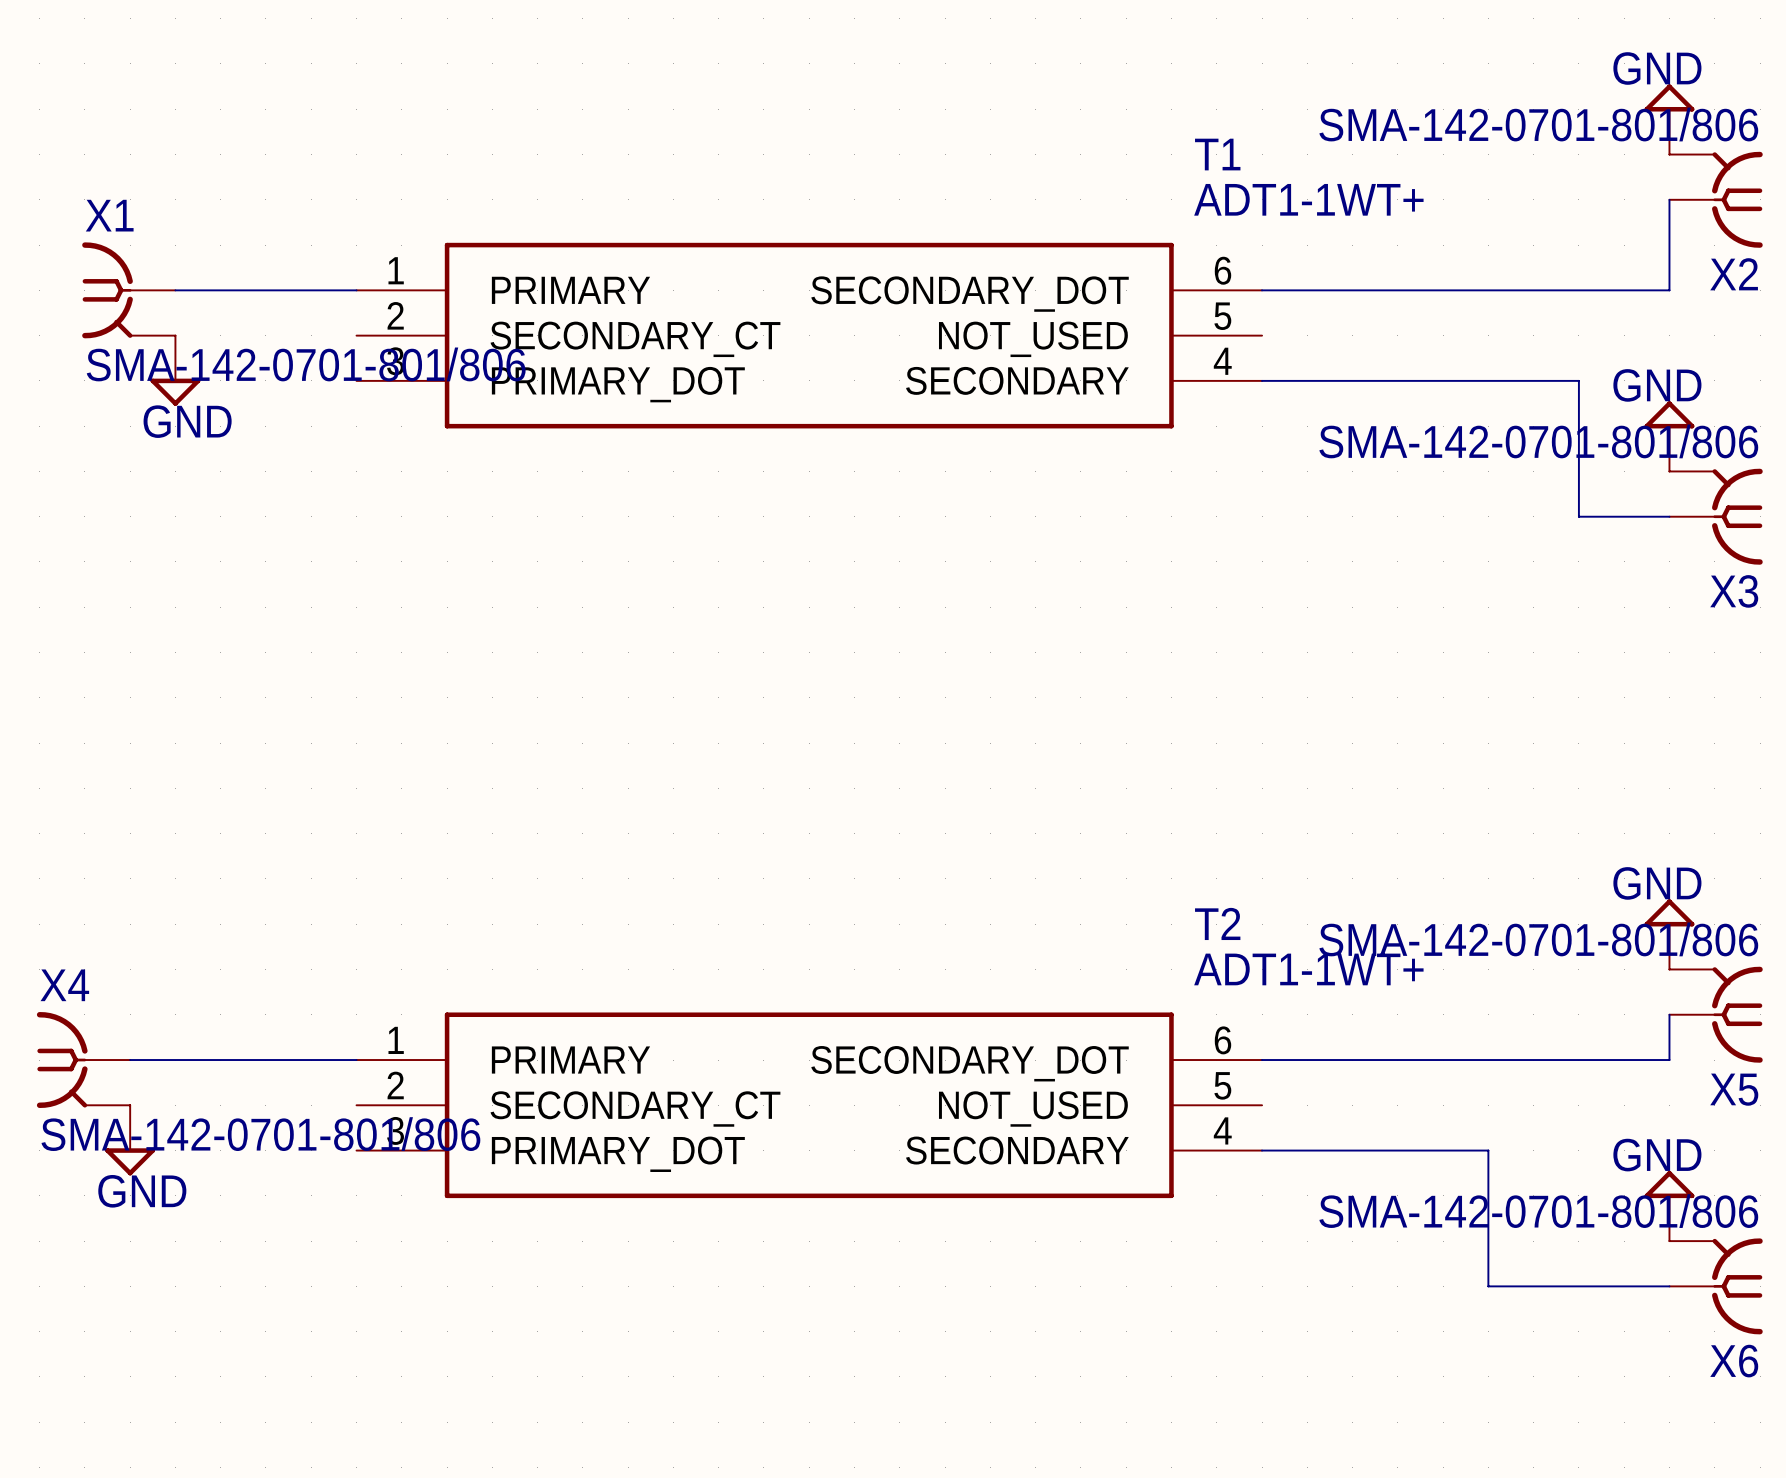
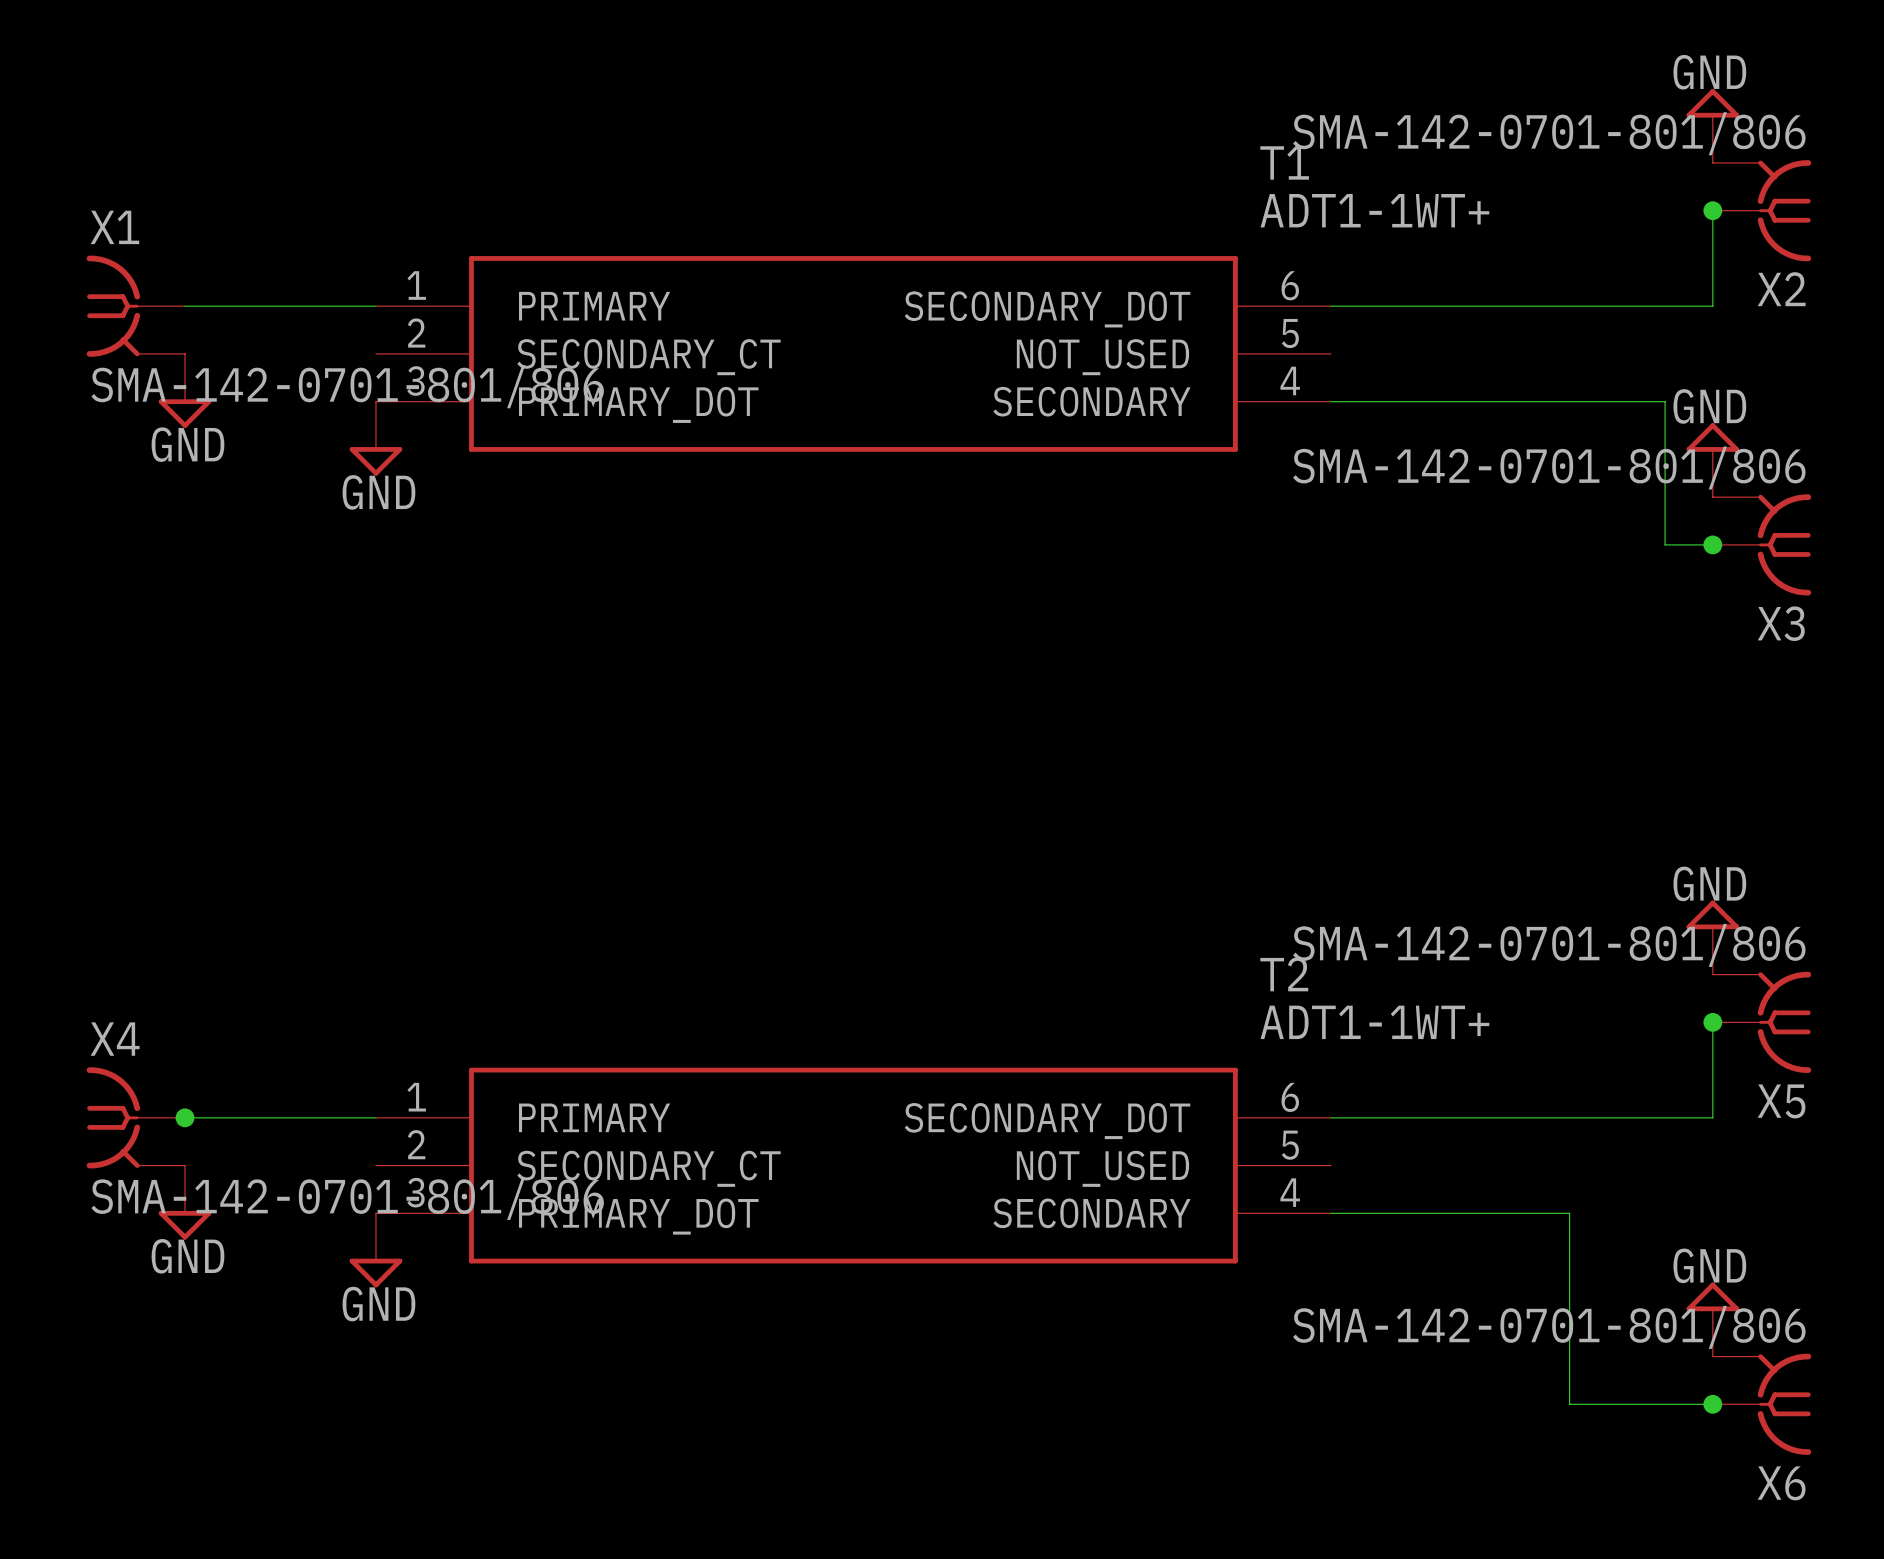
power symbol position: GND (1669, 119) -> GND (1712, 125)
junction: none -> (1712, 210)
wire: (1669, 199) (1669, 290) (1624, 290) -> (1712, 210) (1712, 306)
X2 position: (1716, 199) -> (1762, 210)
power symbol: none -> GND (375, 438)
power symbol position: GND (1669, 436) -> GND (1712, 460)
junction: none -> (1712, 544)
X3 position: (1716, 516) -> (1762, 544)
power symbol position: GND (1669, 934) -> GND (1712, 937)
junction: none -> (1712, 1022)
wire: (1669, 1014) (1669, 1060) (1624, 1060) -> (1712, 1022) (1712, 1117)
X5 position: (1716, 1014) -> (1762, 1022)
X4 position: (83, 1060) -> (135, 1117)
junction: none -> (185, 1117)
power symbol position: GND (130, 1140) -> GND (185, 1202)
power symbol: none -> GND (375, 1250)
power symbol position: GND (1669, 1206) -> GND (1712, 1319)
wire: (1488, 1286) (1669, 1286) -> (1569, 1356) (1569, 1404) (1712, 1404)
X6 position: (1716, 1286) -> (1762, 1404)
junction: none -> (1712, 1404)

